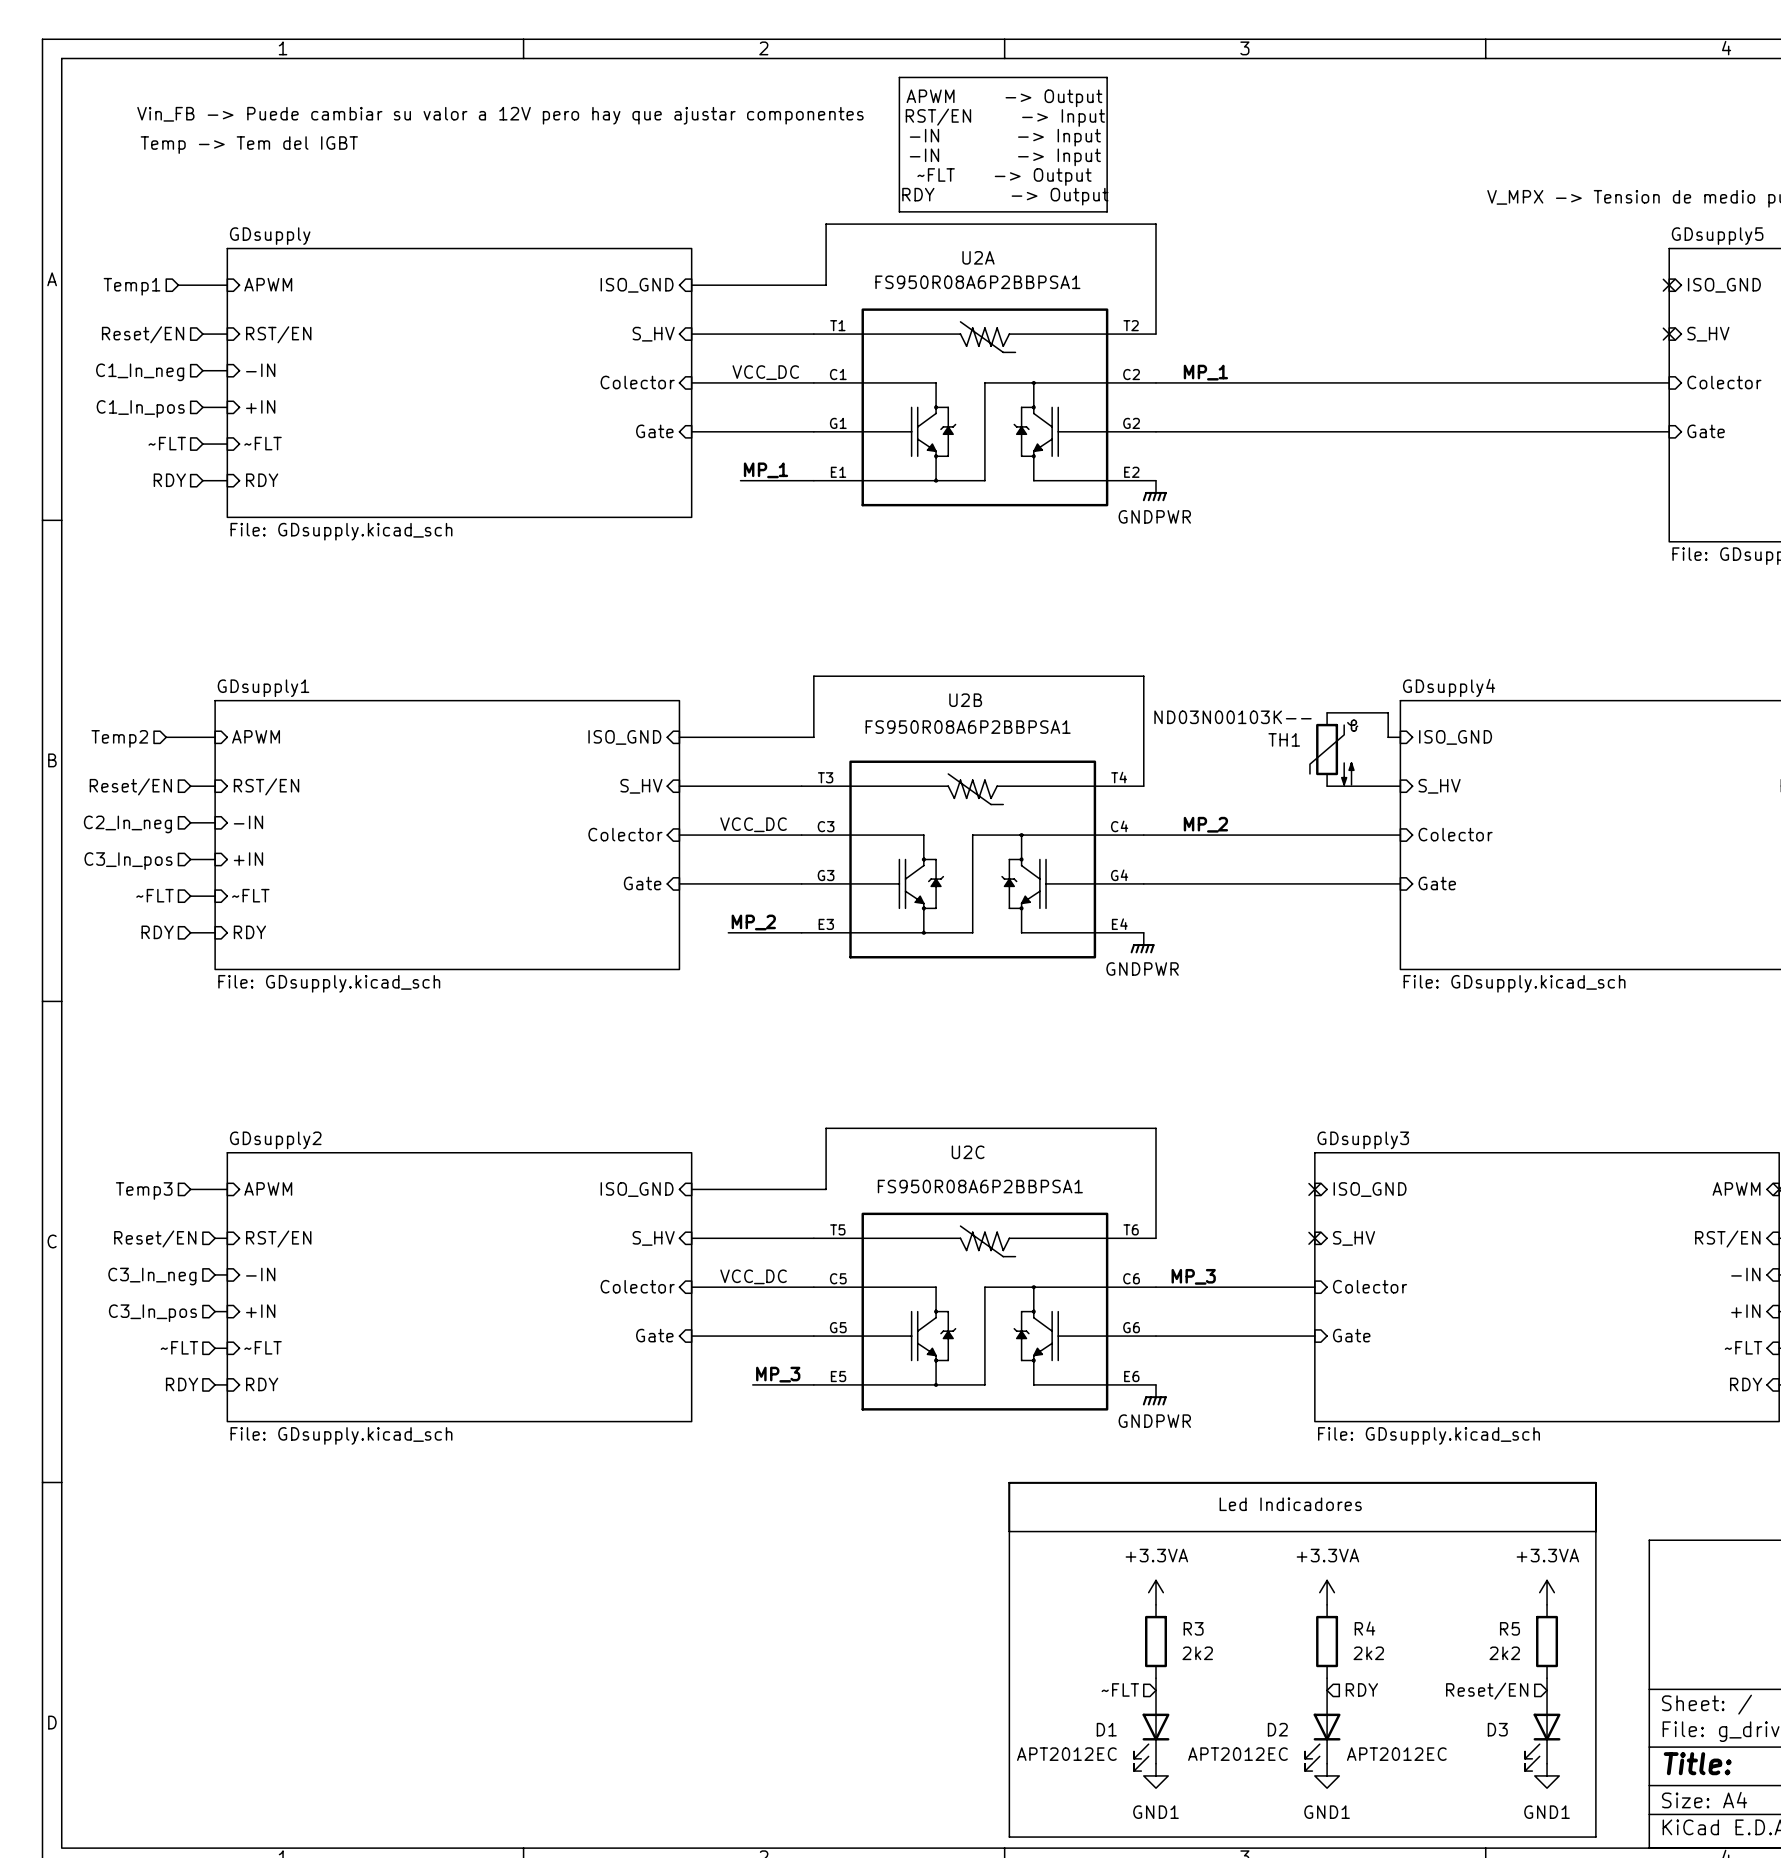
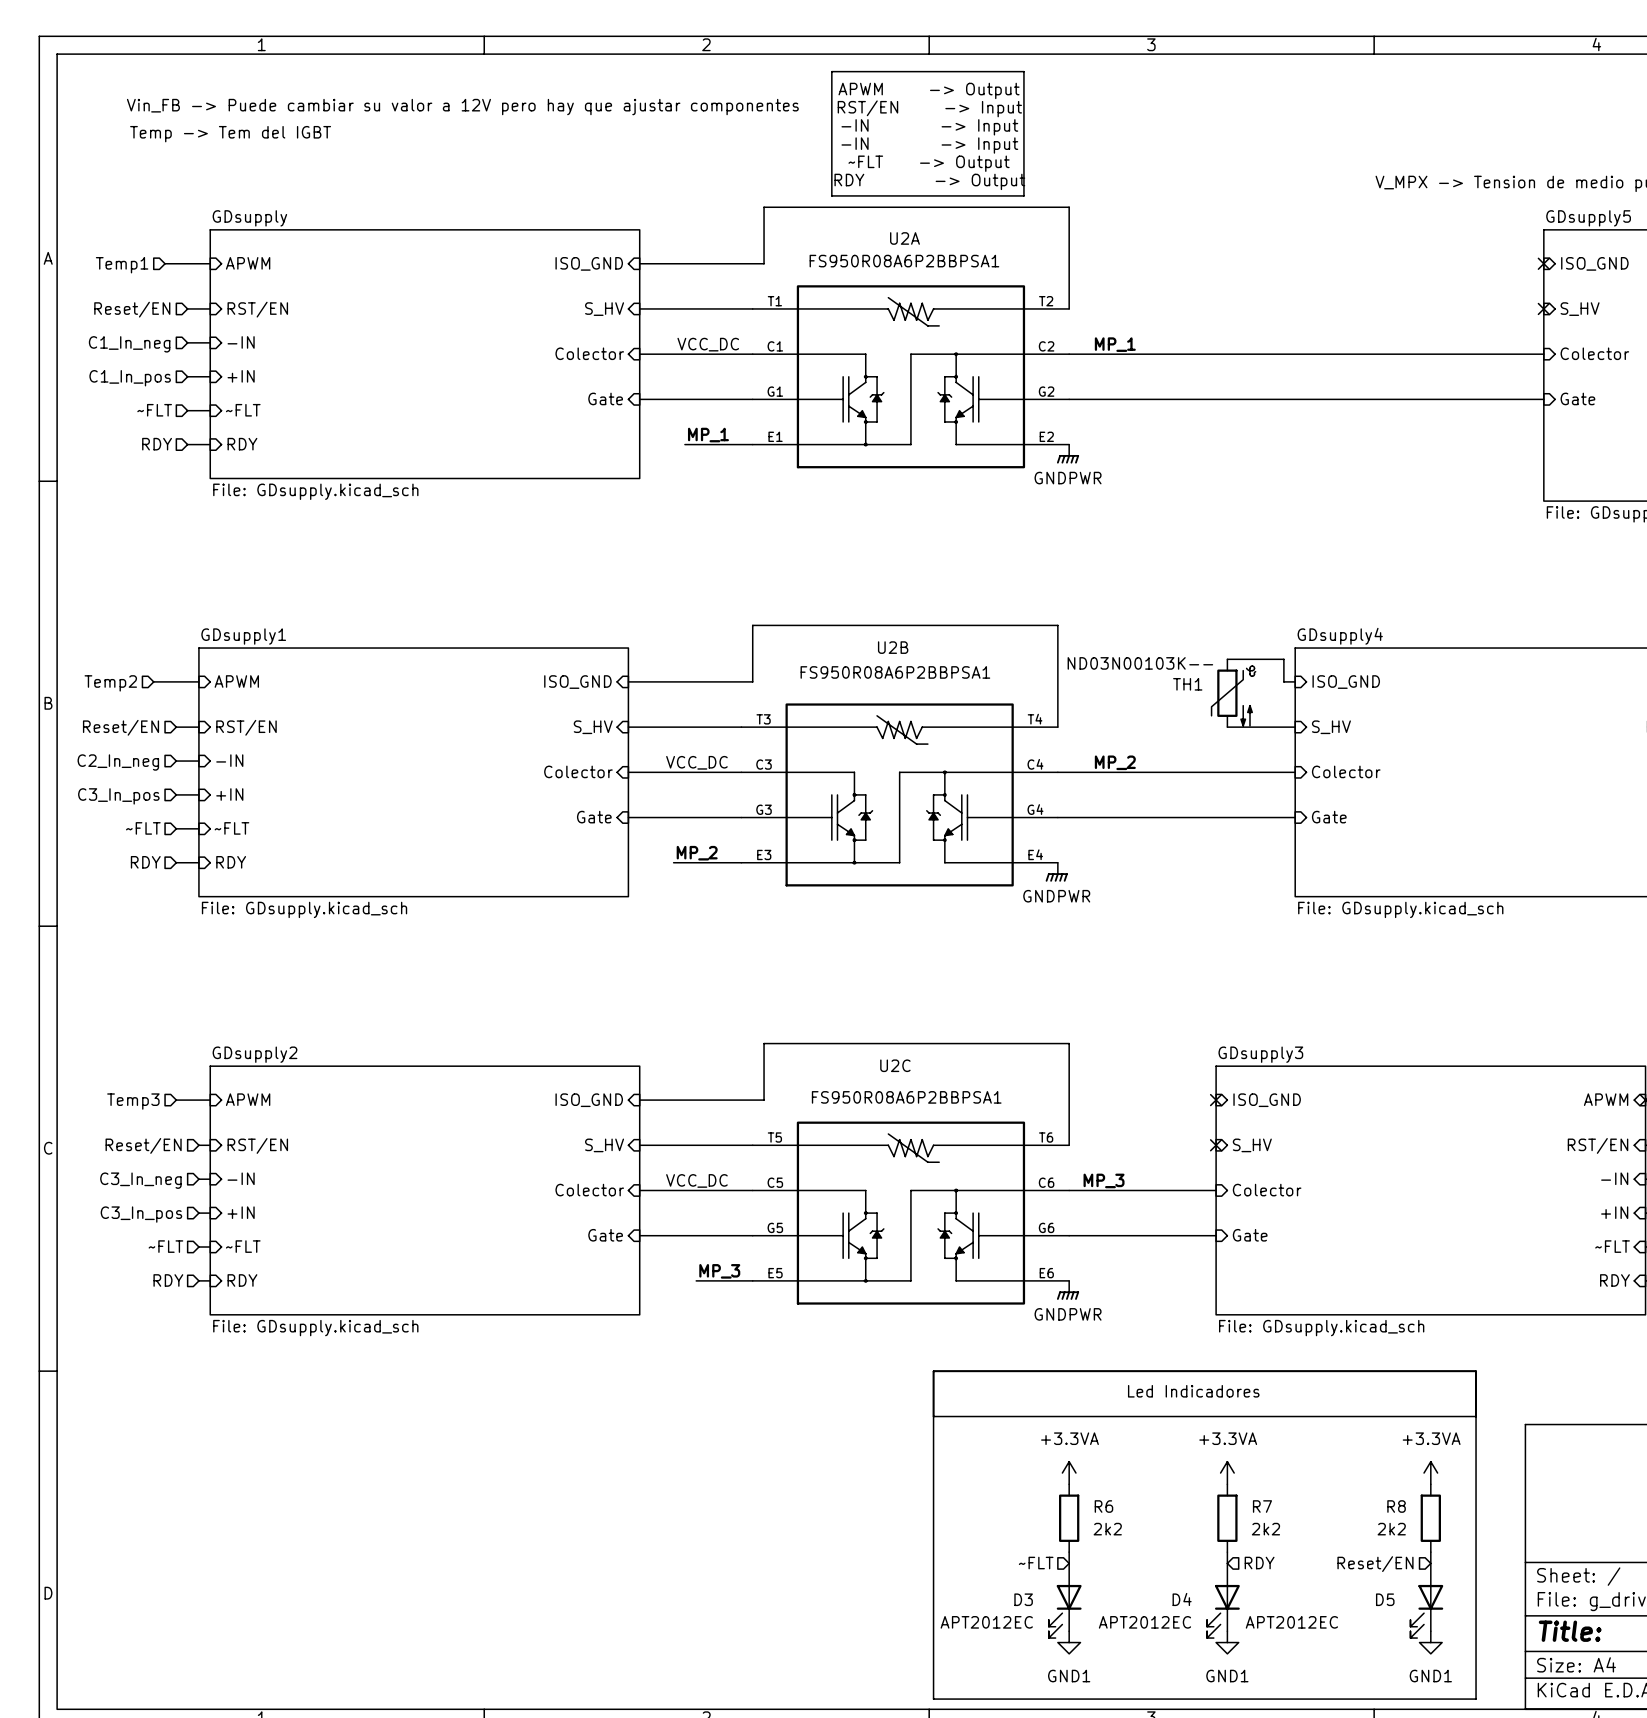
R3 name: R3 (1193, 1628) -> R6 (1103, 1506)
R4 name: R4 (1364, 1628) -> R7 (1262, 1506)
R5 name: R5 (1509, 1628) -> R8 (1396, 1506)
D1 name: D1 (1106, 1729) -> D3 (1023, 1599)
D2 name: D2 (1277, 1729) -> D4 (1182, 1599)
D3 name: D3 (1497, 1729) -> D5 (1385, 1599)

